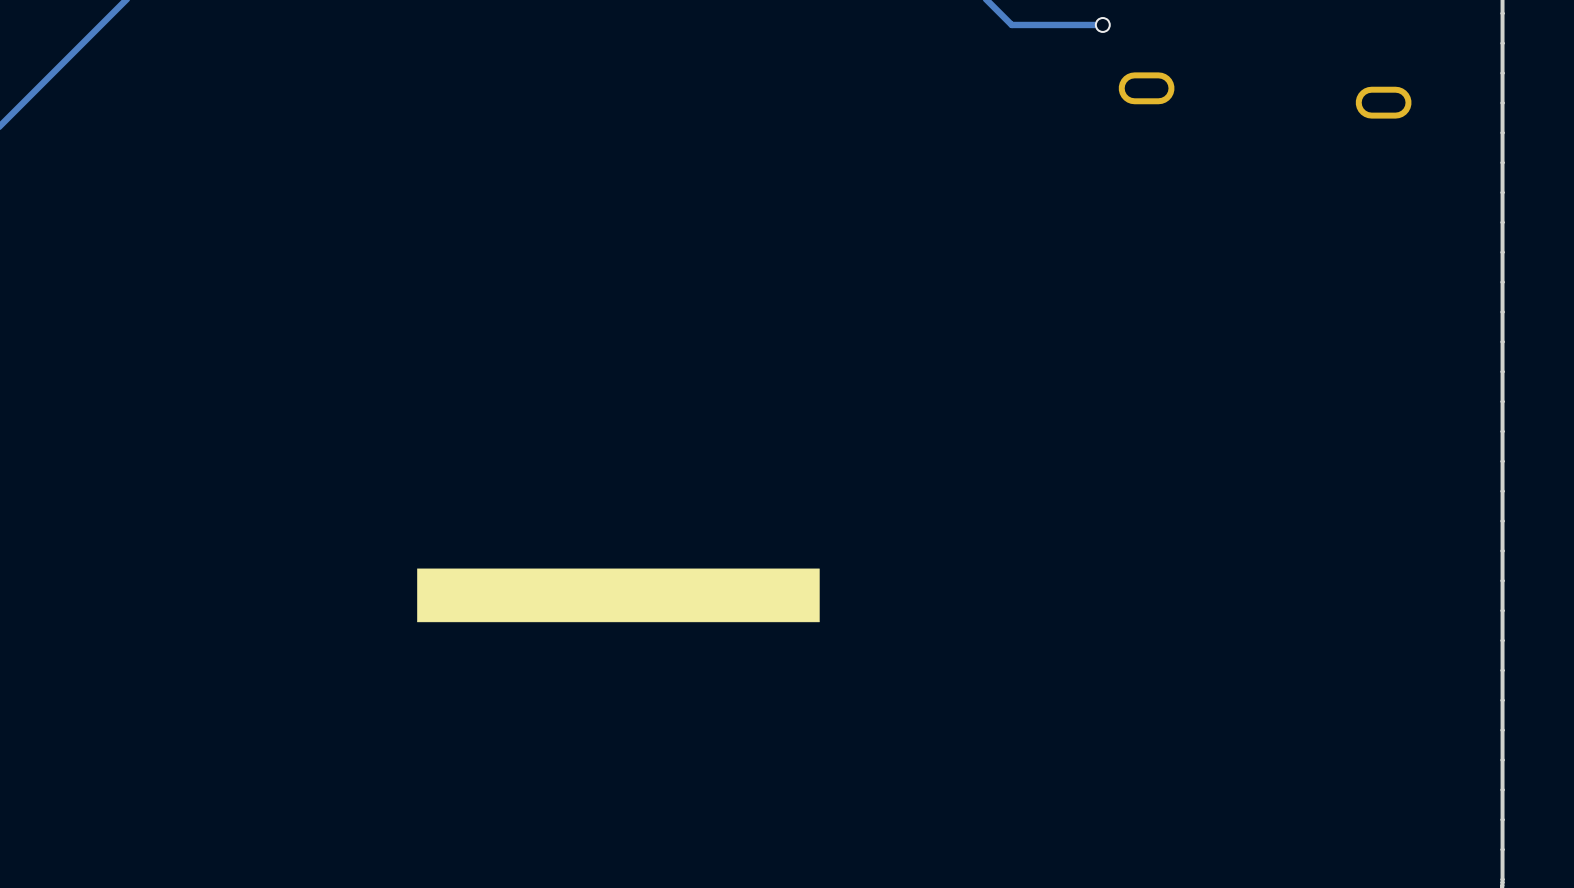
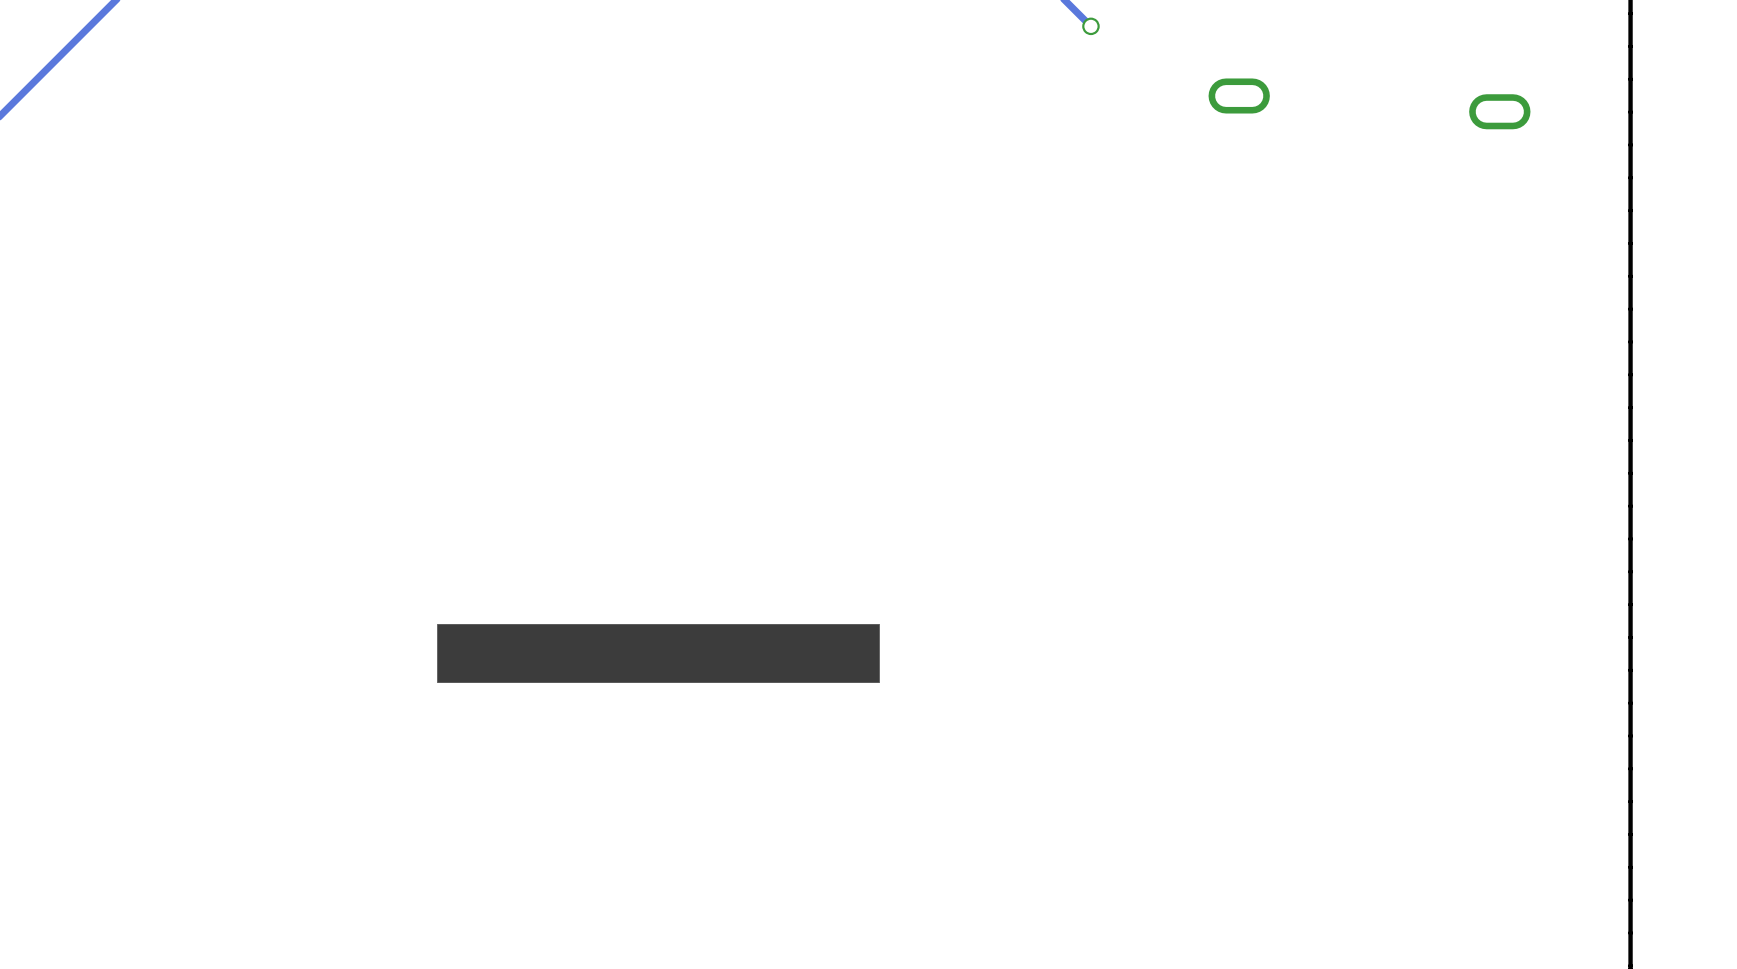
track: (1102, 24) (1011, 24) -> none
via position: (1102, 24) -> (1090, 26)

